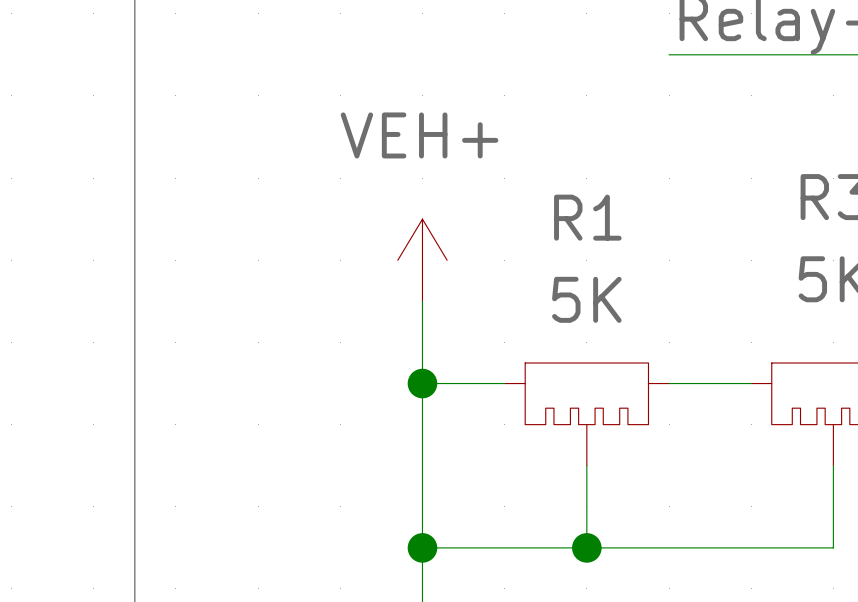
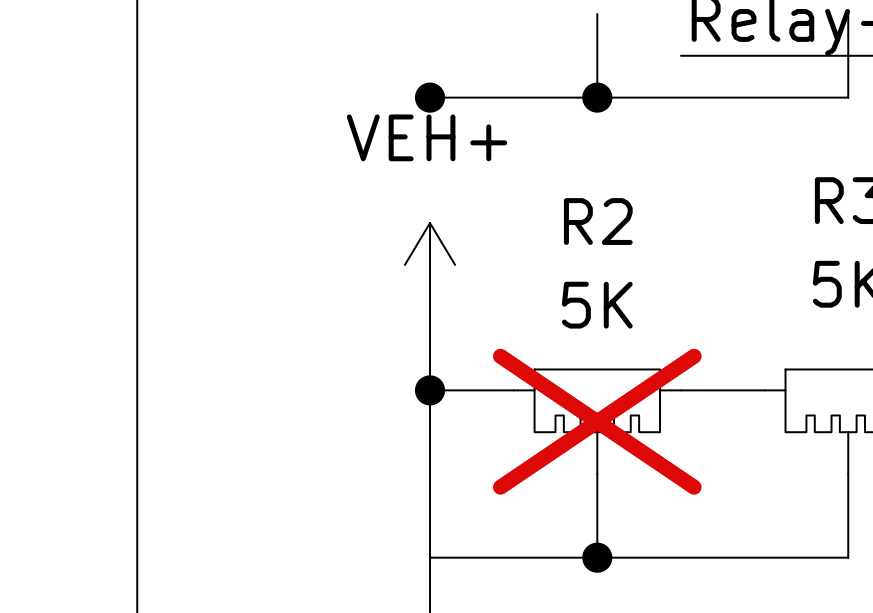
wire: none -> (597, 13) (597, 97)
wire: none -> (848, 13) (848, 97) (430, 97)
junction: none -> (430, 97)
junction: none -> (597, 97)
R1 name: R1 (587, 217) -> R2 (598, 221)
R1 do-not-place cross: none -> (597, 421)
junction: (422, 547) -> none

